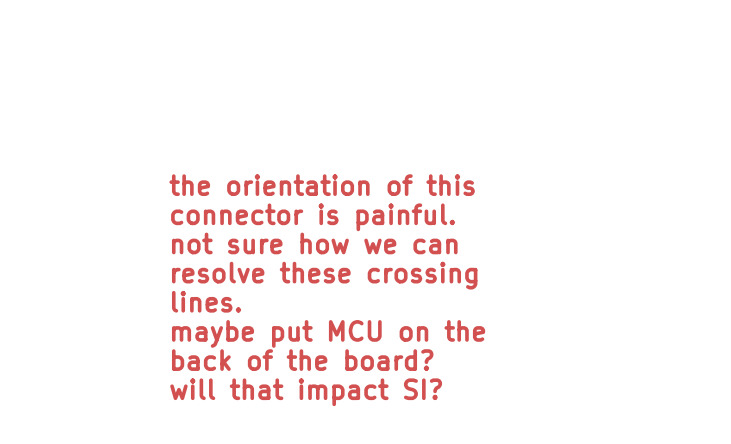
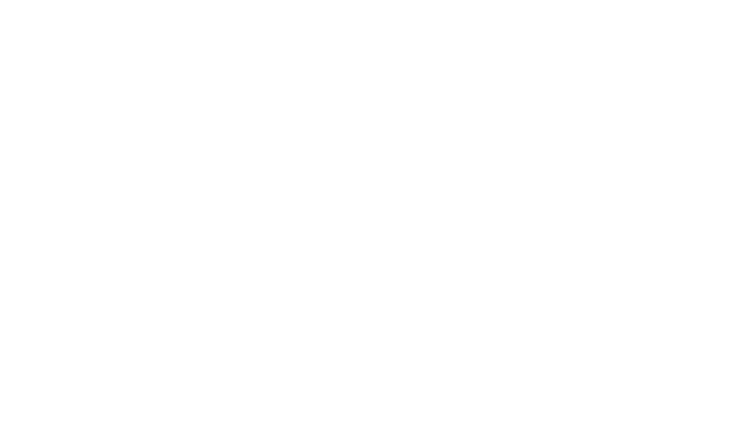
text: the orientation of this (322, 185) -> none
text: connector is painful. (313, 217) -> none
text: not sure how we can (314, 243) -> none
text: resolve these crossing (324, 275) -> none
text: lines. (206, 301) -> none
text: maybe put MCU on the (328, 333) -> none
text: back of the board? (302, 360) -> none
text: will that impact SI? (306, 392) -> none

